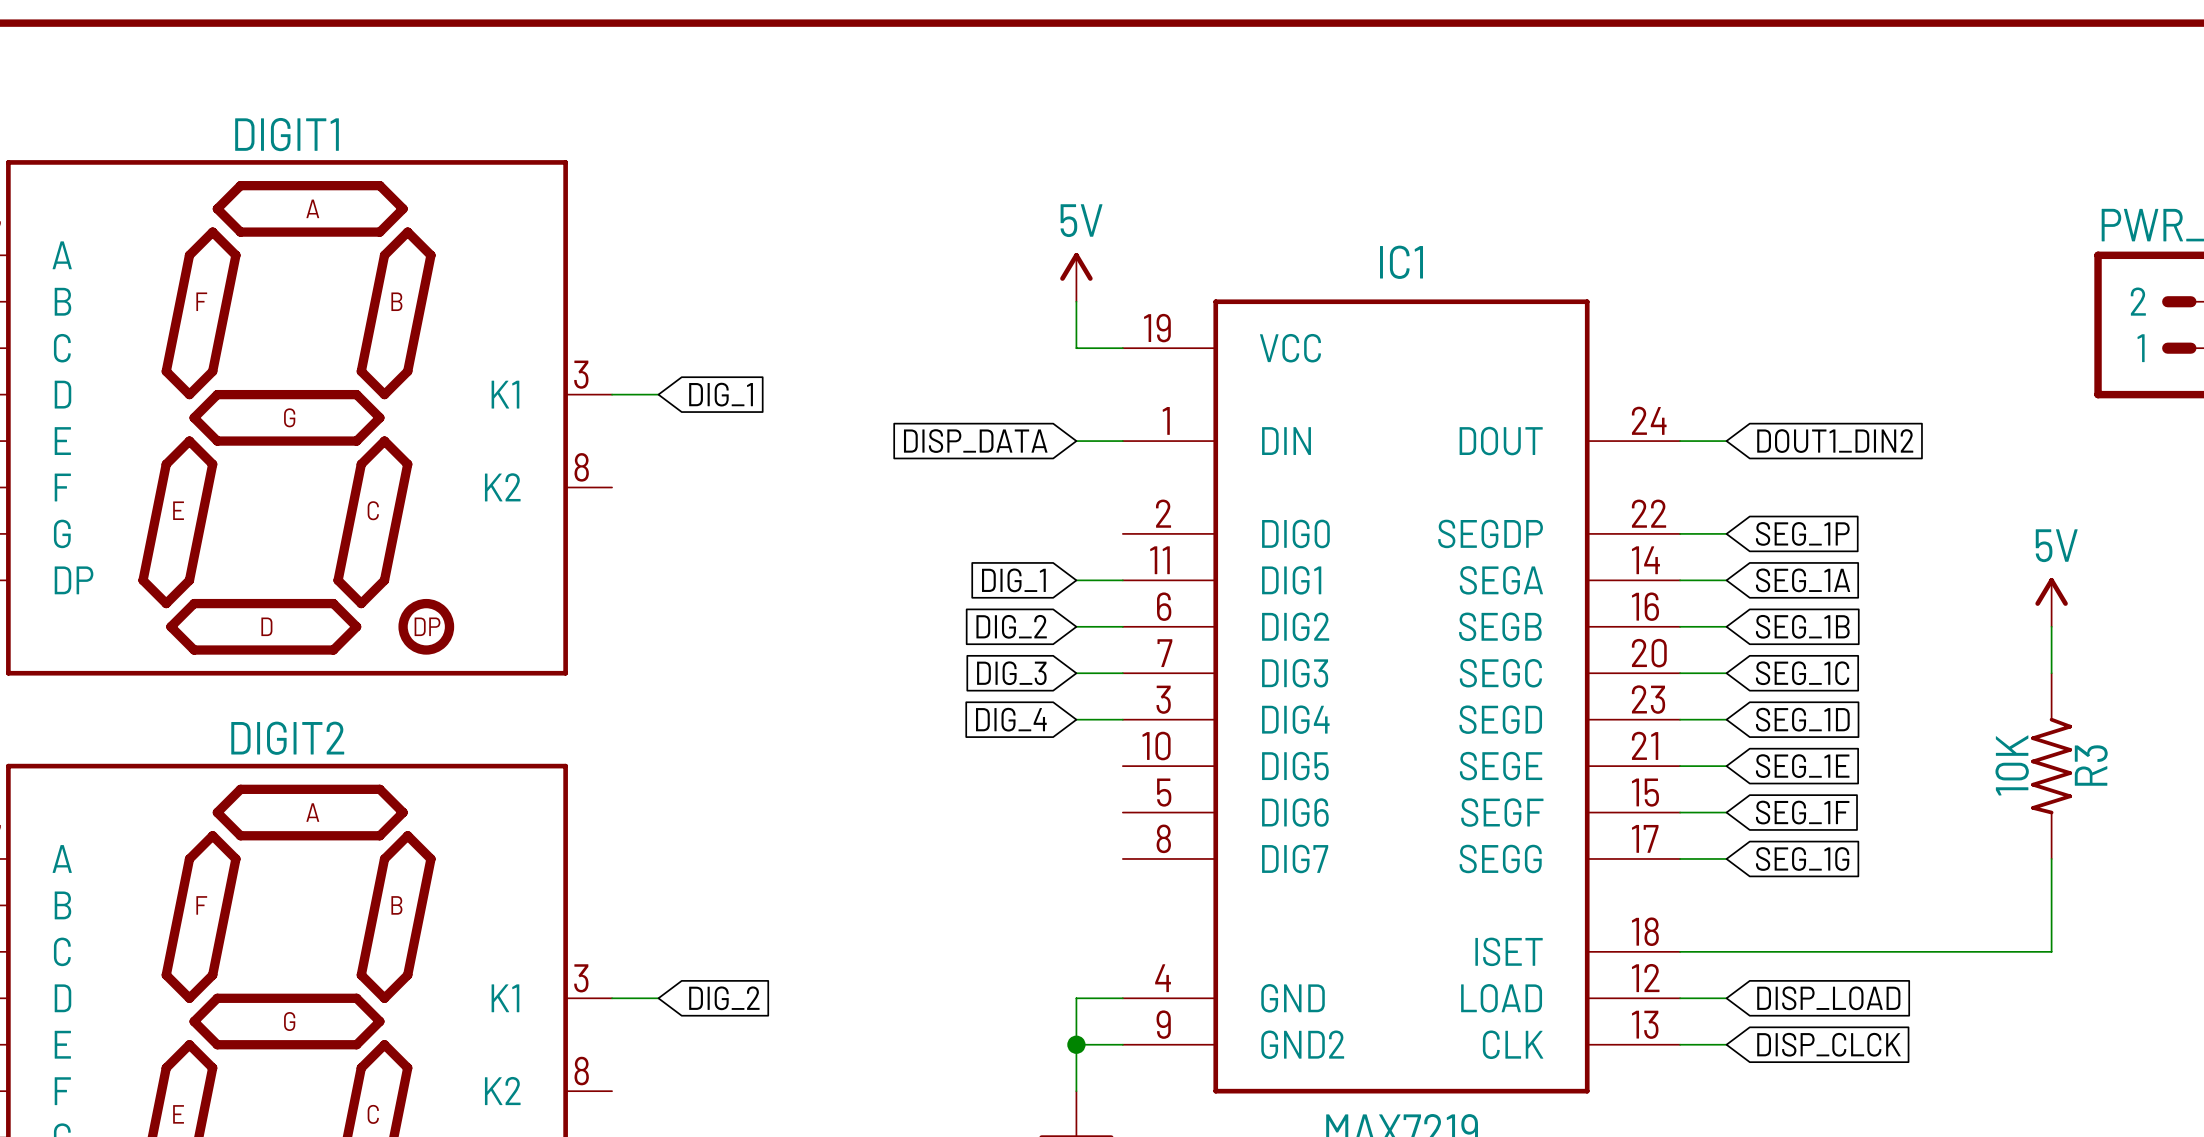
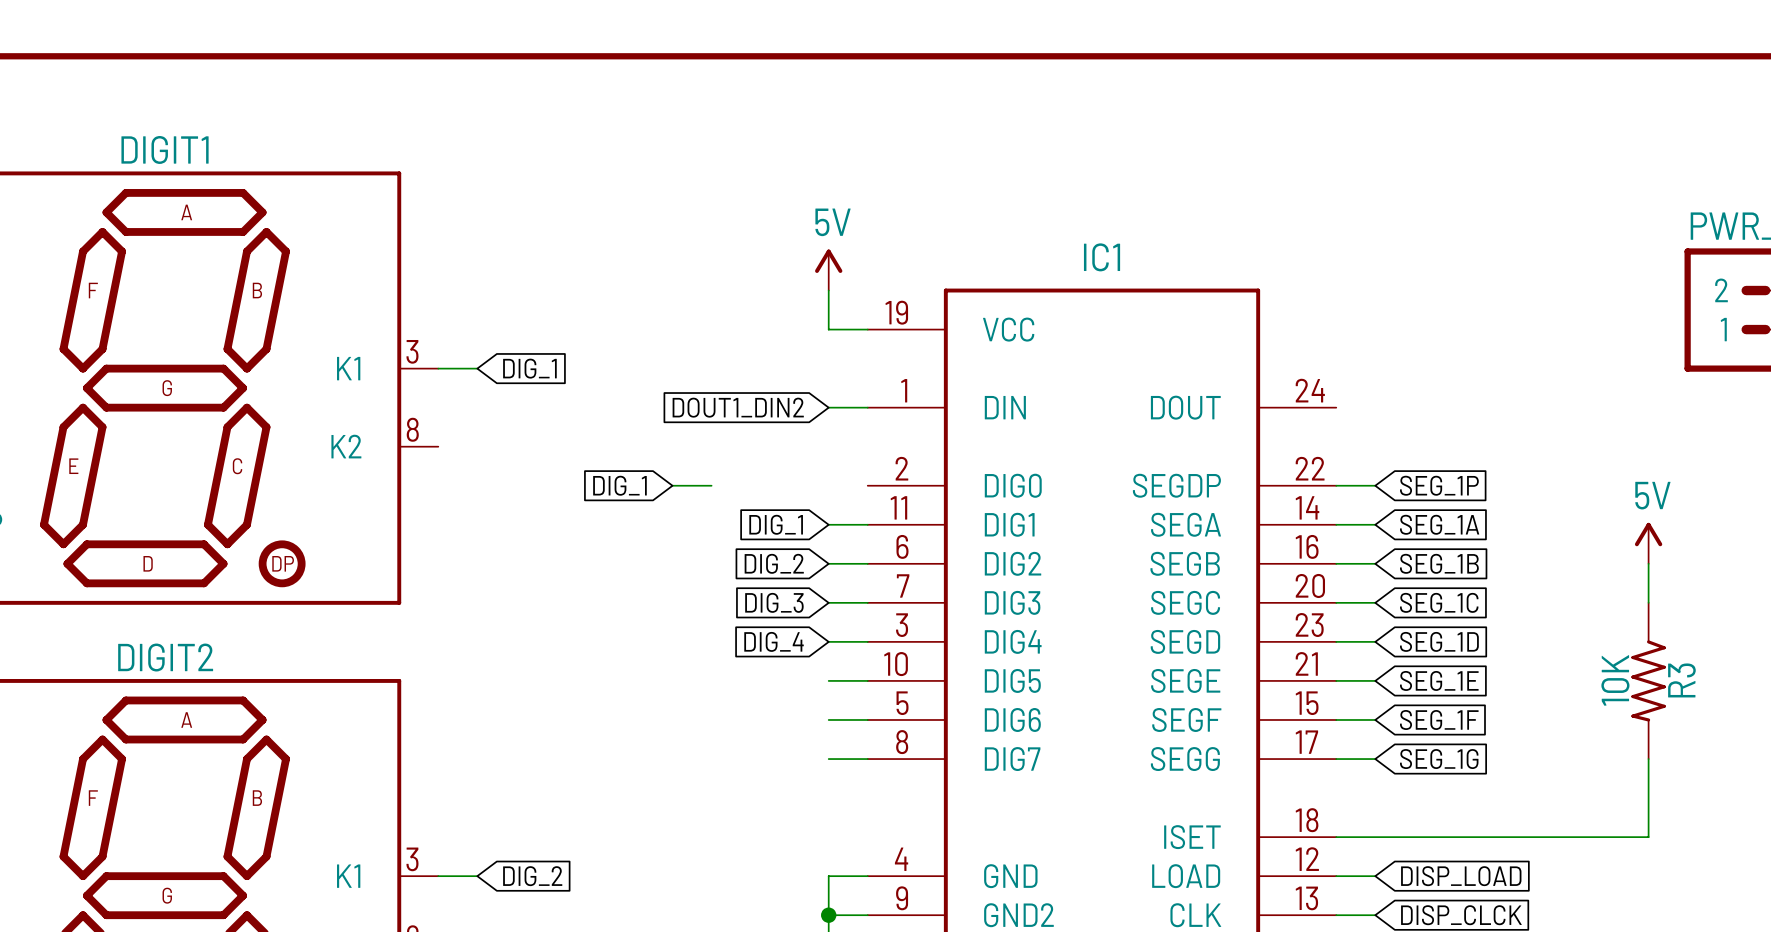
global label: DISP_DATA (975, 441) -> DOUT1_DIN2 (738, 407)
wire: (1680, 441) (1726, 441) -> none
global label: DOUT1_DIN2 (1835, 441) -> none
global label: none -> DIG_1 (619, 485)
wire: none -> (672, 485) (711, 485)
wire: none -> (828, 680) (867, 680)
wire: none -> (828, 719) (867, 719)
wire: none -> (828, 759) (867, 759)

